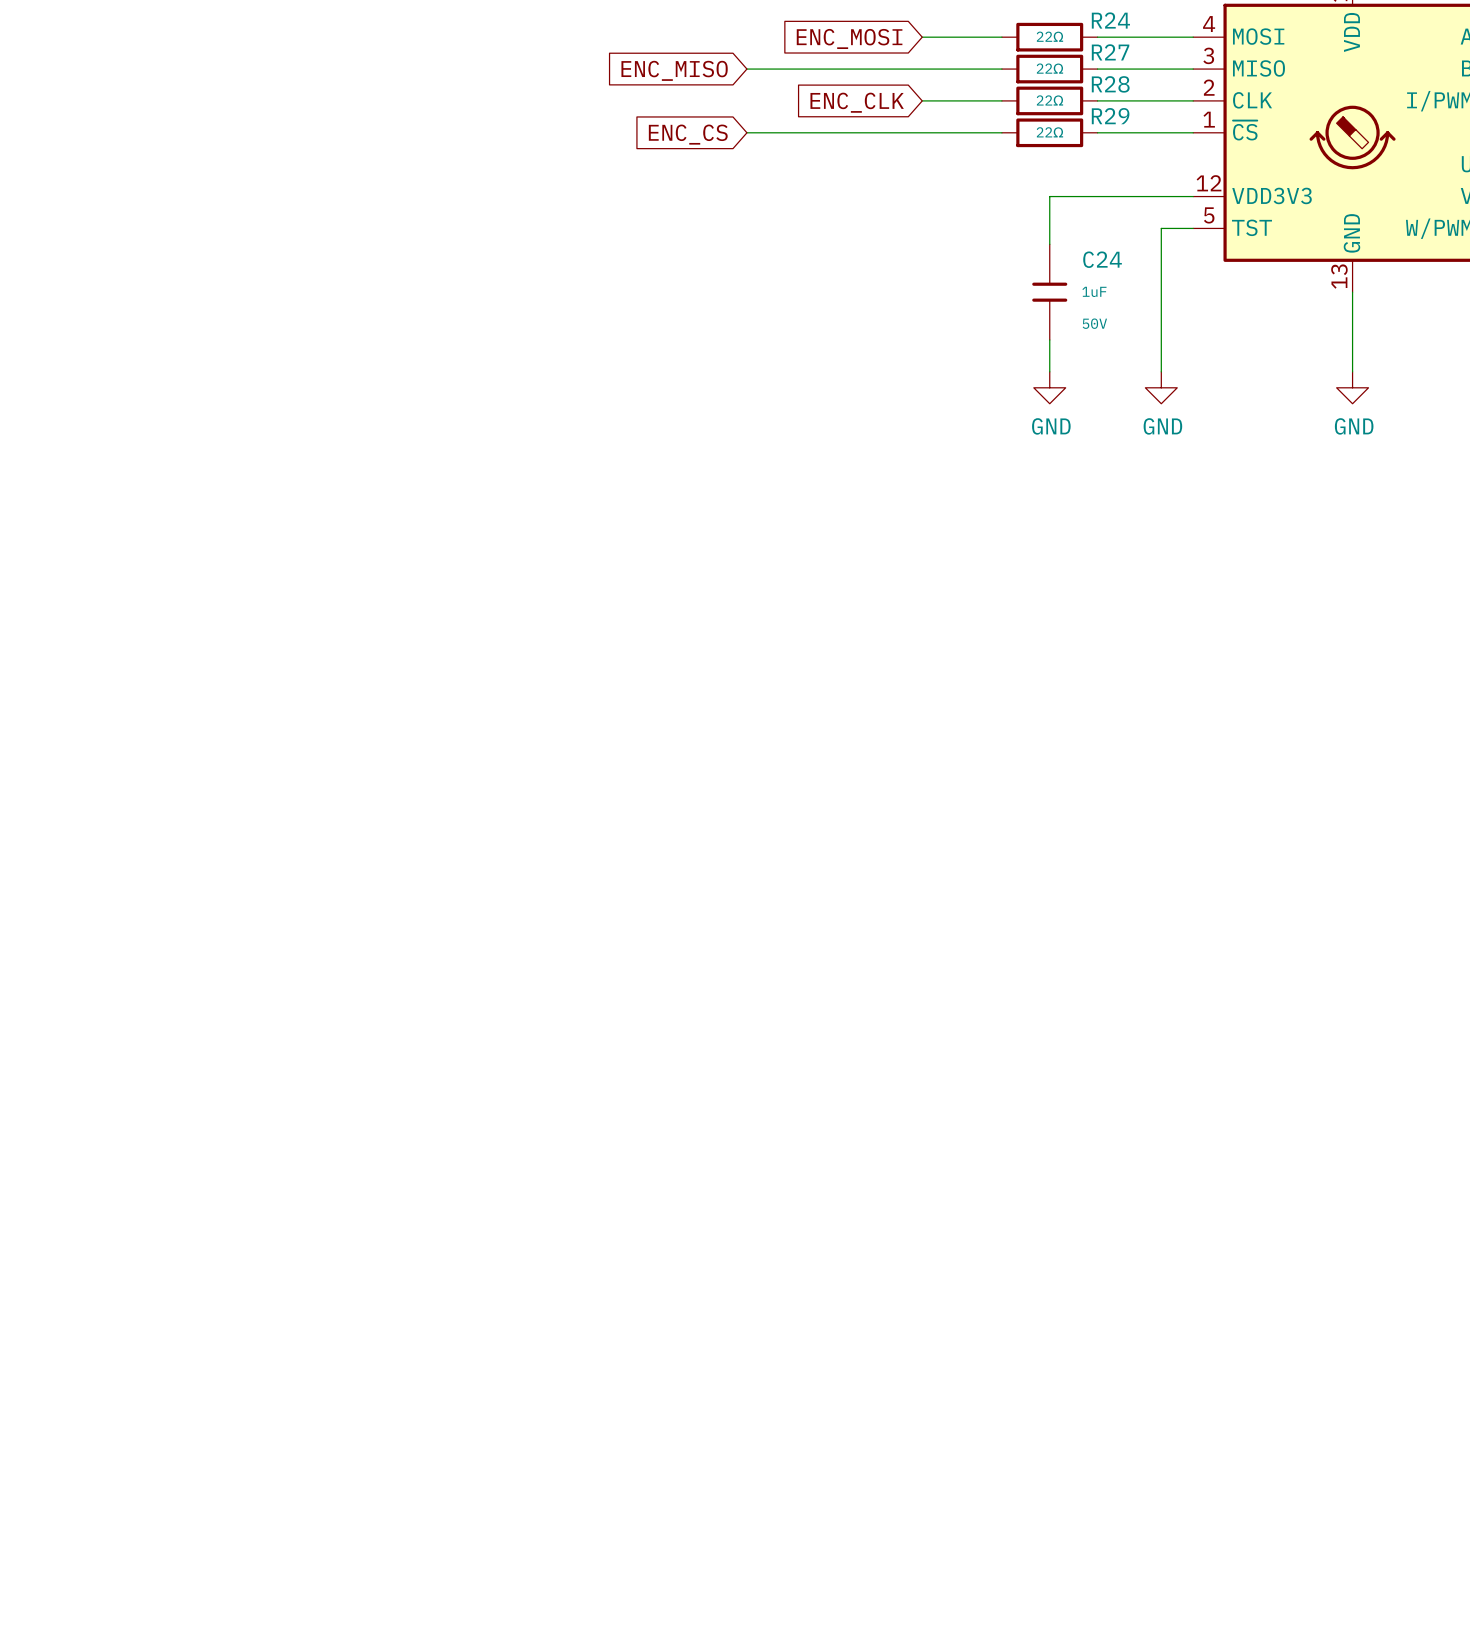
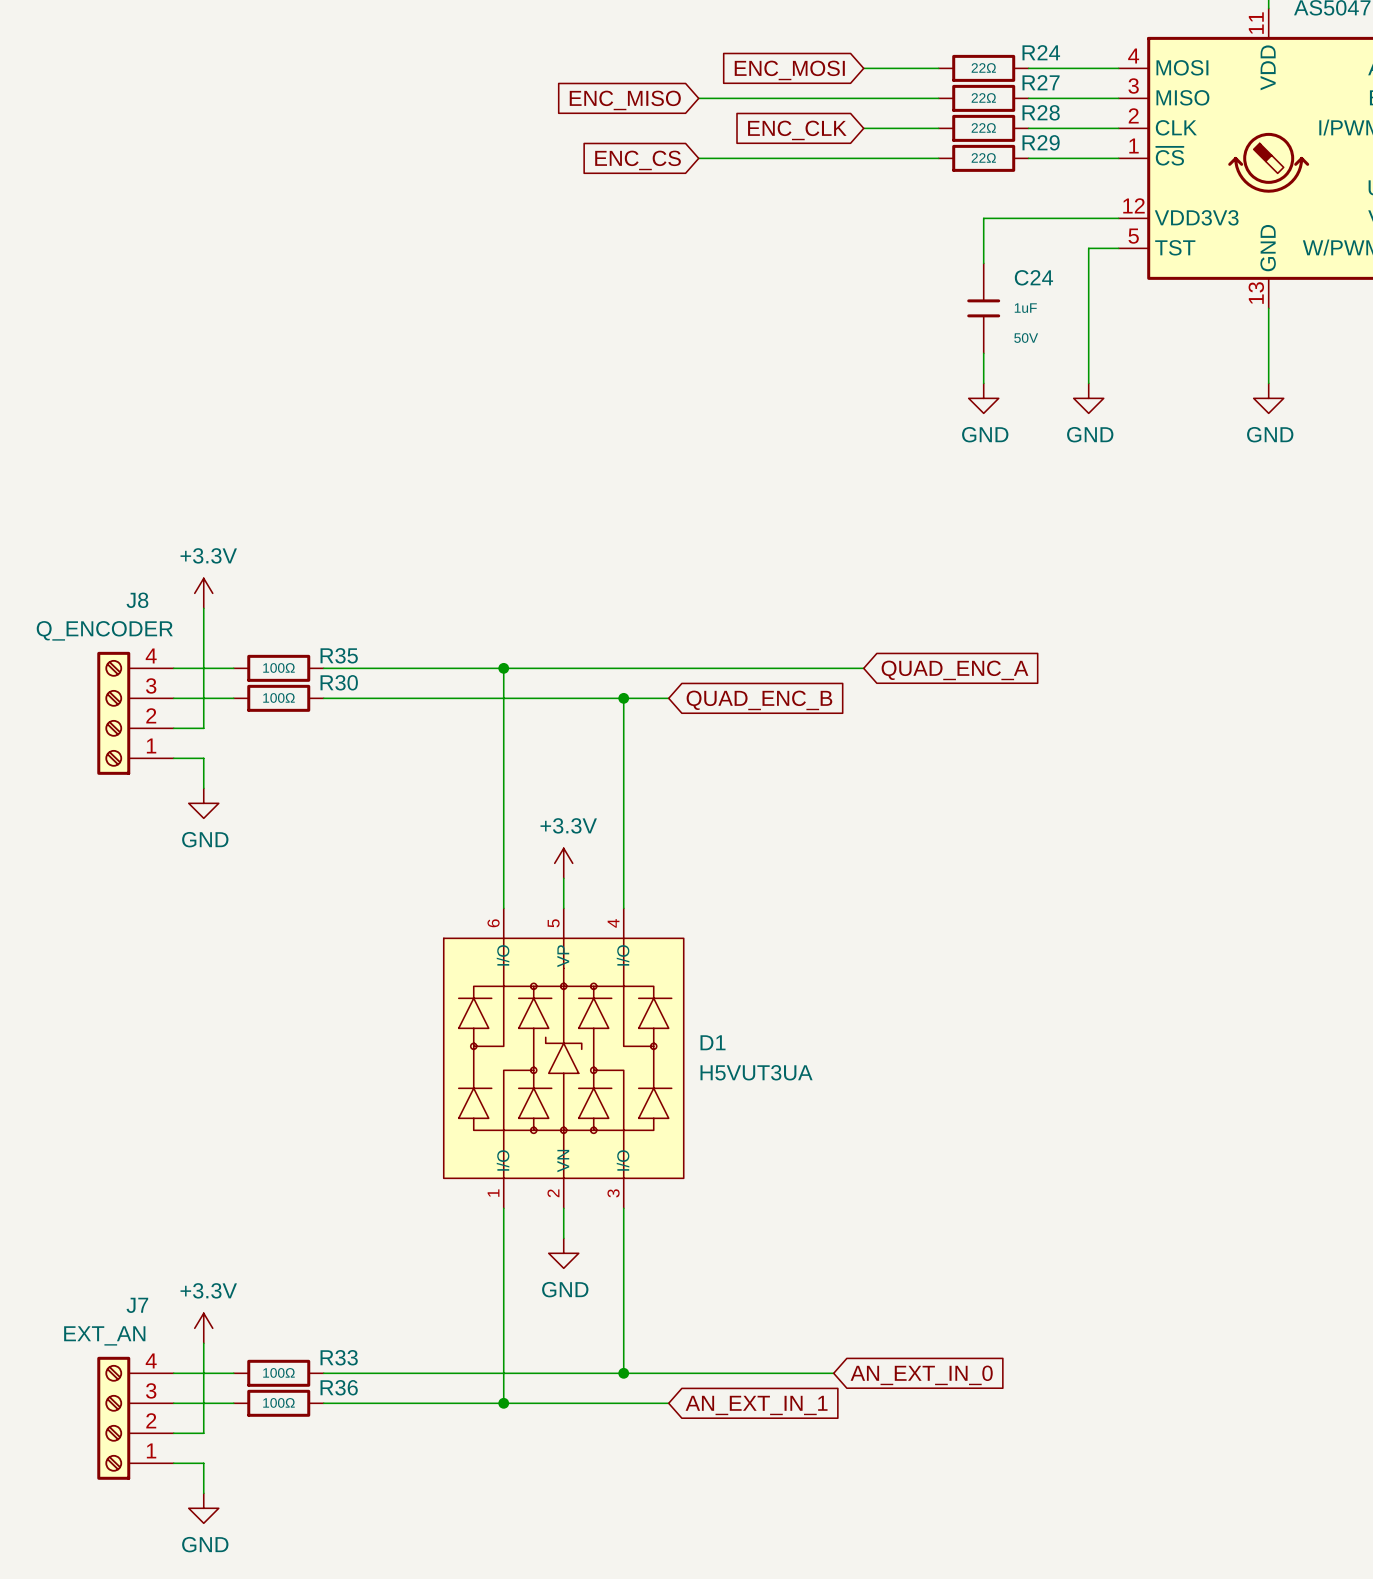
power symbol: none -> +3.3V (203, 593)
wire: none -> (203, 608) (203, 728) (173, 728)
wire: none -> (173, 668) (233, 668)
R35: none -> 100Ω (278, 668)
wire: none -> (323, 668) (863, 668)
wire: none -> (503, 668) (503, 908)
junction: none -> (503, 668)
global label: none -> QUAD_ENC_A (954, 670)
wire: none -> (173, 698) (233, 698)
R30: none -> 100Ω (278, 698)
wire: none -> (323, 698) (668, 698)
wire: none -> (623, 698) (623, 908)
junction: none -> (623, 698)
global label: none -> QUAD_ENC_B (759, 700)
J8: none -> Q_ENCODER (135, 713)
wire: none -> (173, 758) (203, 758) (203, 788)
power symbol: none -> GND (203, 803)
power symbol: none -> +3.3V (563, 863)
wire: none -> (563, 878) (563, 908)
D1: none -> H5VUT3UA (563, 1058)
wire: none -> (503, 1208) (503, 1403)
wire: none -> (563, 1208) (563, 1238)
wire: none -> (623, 1208) (623, 1373)
power symbol: none -> GND (563, 1253)
power symbol: none -> +3.3V (203, 1328)
wire: none -> (203, 1343) (203, 1433) (173, 1433)
wire: none -> (173, 1373) (233, 1373)
R33: none -> 100Ω (278, 1373)
wire: none -> (323, 1373) (833, 1373)
junction: none -> (623, 1373)
global label: none -> AN_EXT_IN_0 (921, 1375)
wire: none -> (173, 1403) (233, 1403)
R36: none -> 100Ω (278, 1403)
wire: none -> (323, 1403) (668, 1403)
junction: none -> (503, 1403)
global label: none -> AN_EXT_IN_1 (756, 1405)
J7: none -> EXT_AN (135, 1418)
wire: none -> (173, 1463) (203, 1463) (203, 1493)
power symbol: none -> GND (203, 1508)

